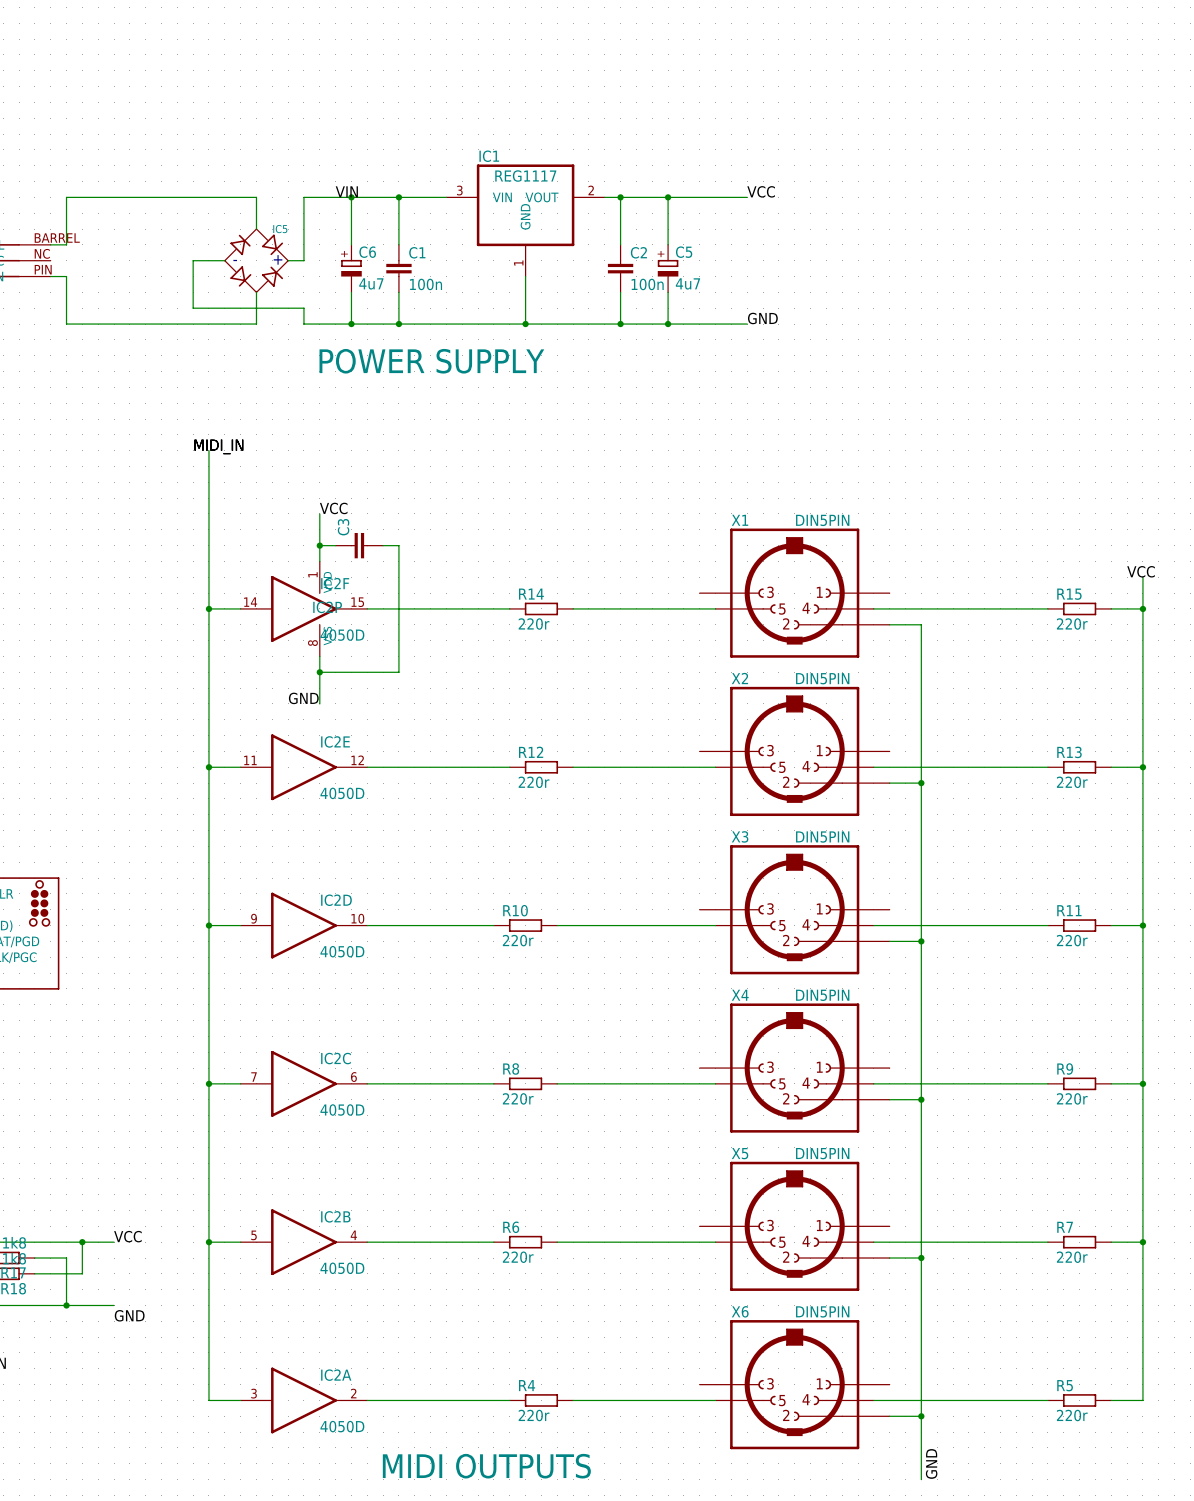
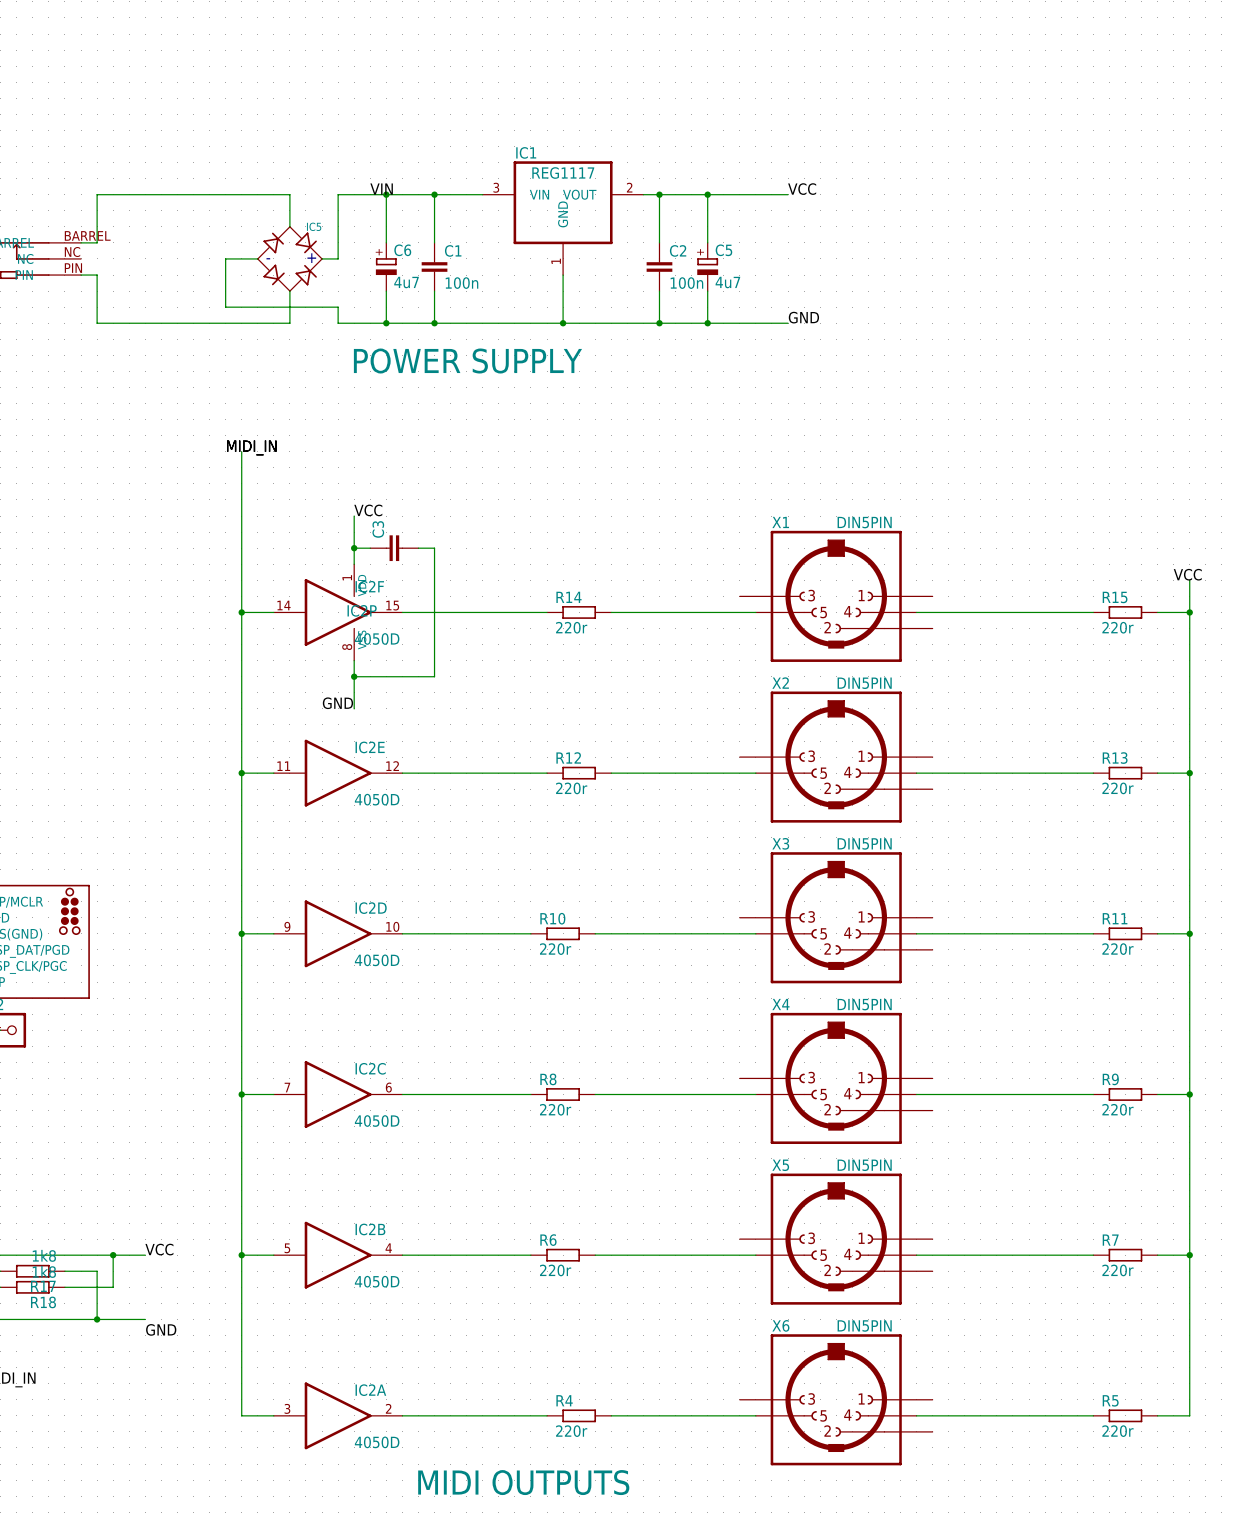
wire: (889, 624) (921, 624) (921, 1479) -> none
wire: (889, 783) (921, 783) -> none
junction: (921, 783) -> none
wire: (889, 941) (921, 941) -> none
junction: (921, 941) -> none
wire: (889, 1099) (921, 1099) -> none
junction: (921, 1099) -> none
wire: (889, 1258) (921, 1258) -> none
junction: (921, 1258) -> none
wire: (889, 1416) (921, 1416) -> none
junction: (921, 1416) -> none
label: GND (931, 1463) -> none

